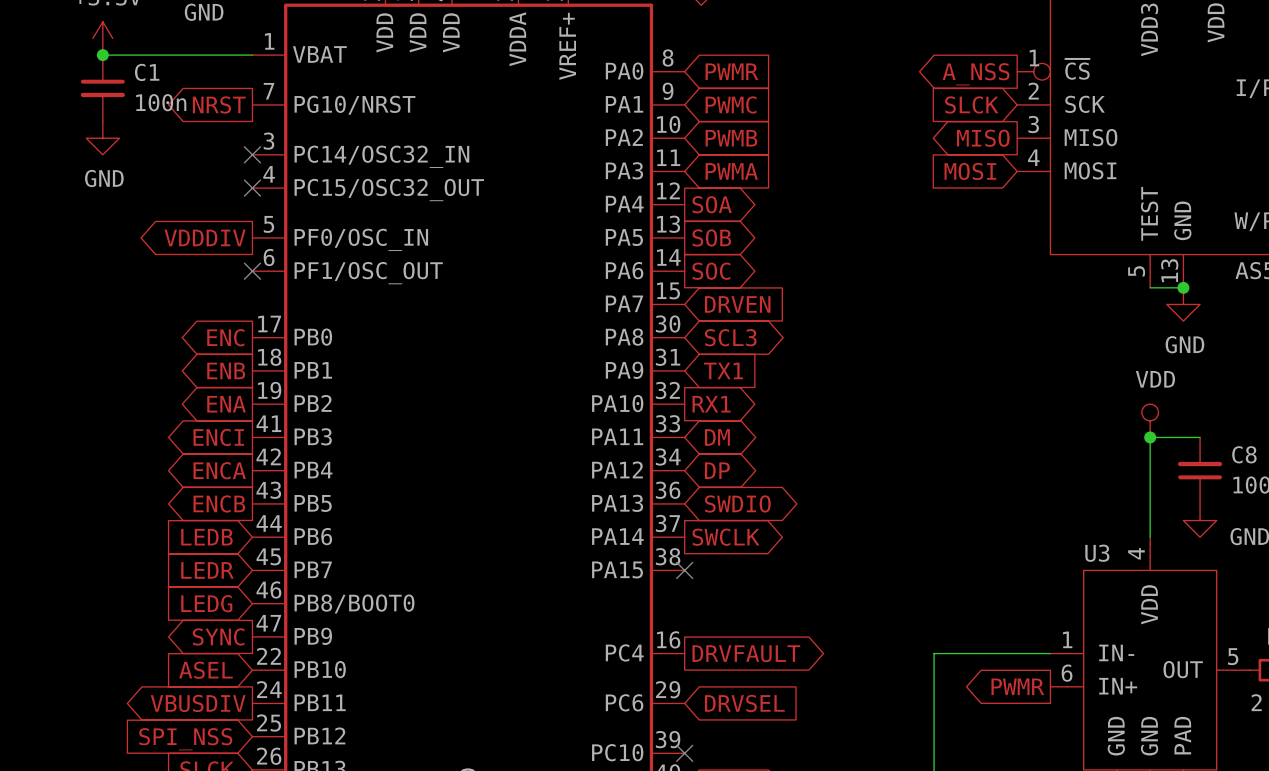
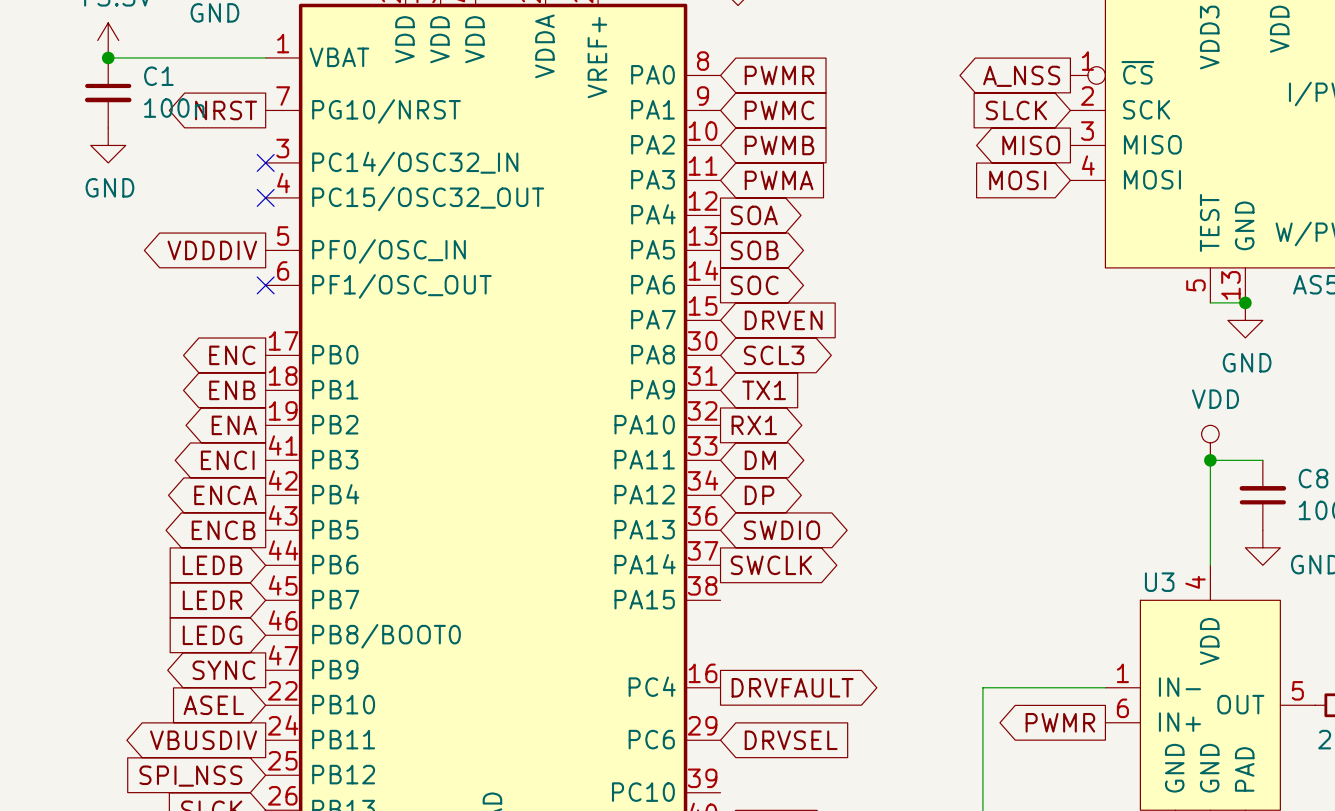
no-connect mark: (684, 570) -> none
no-connect mark: (684, 753) -> none

